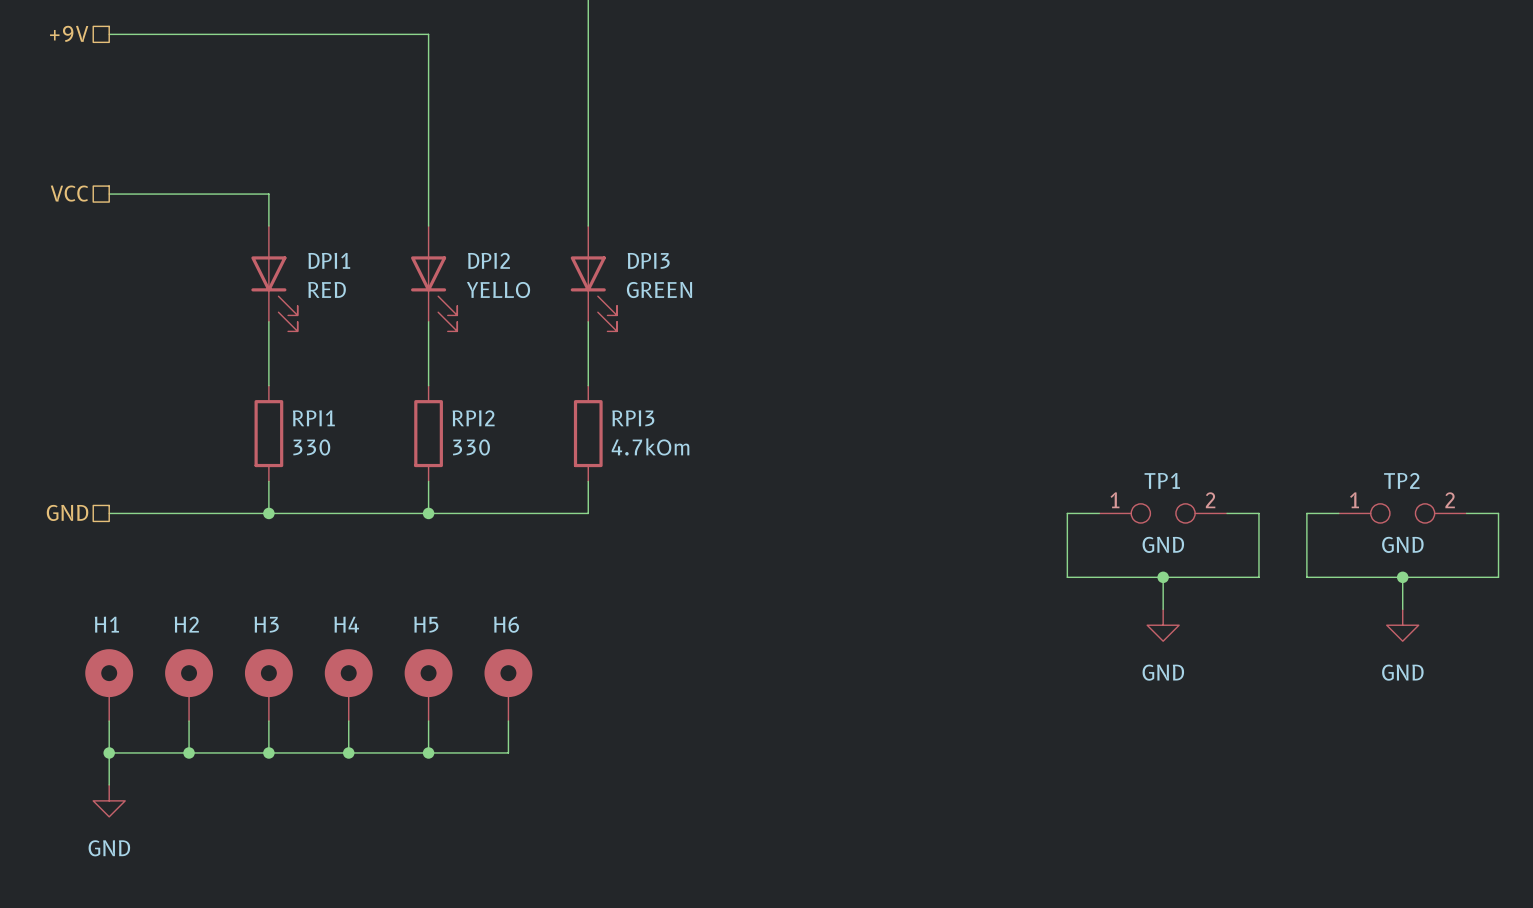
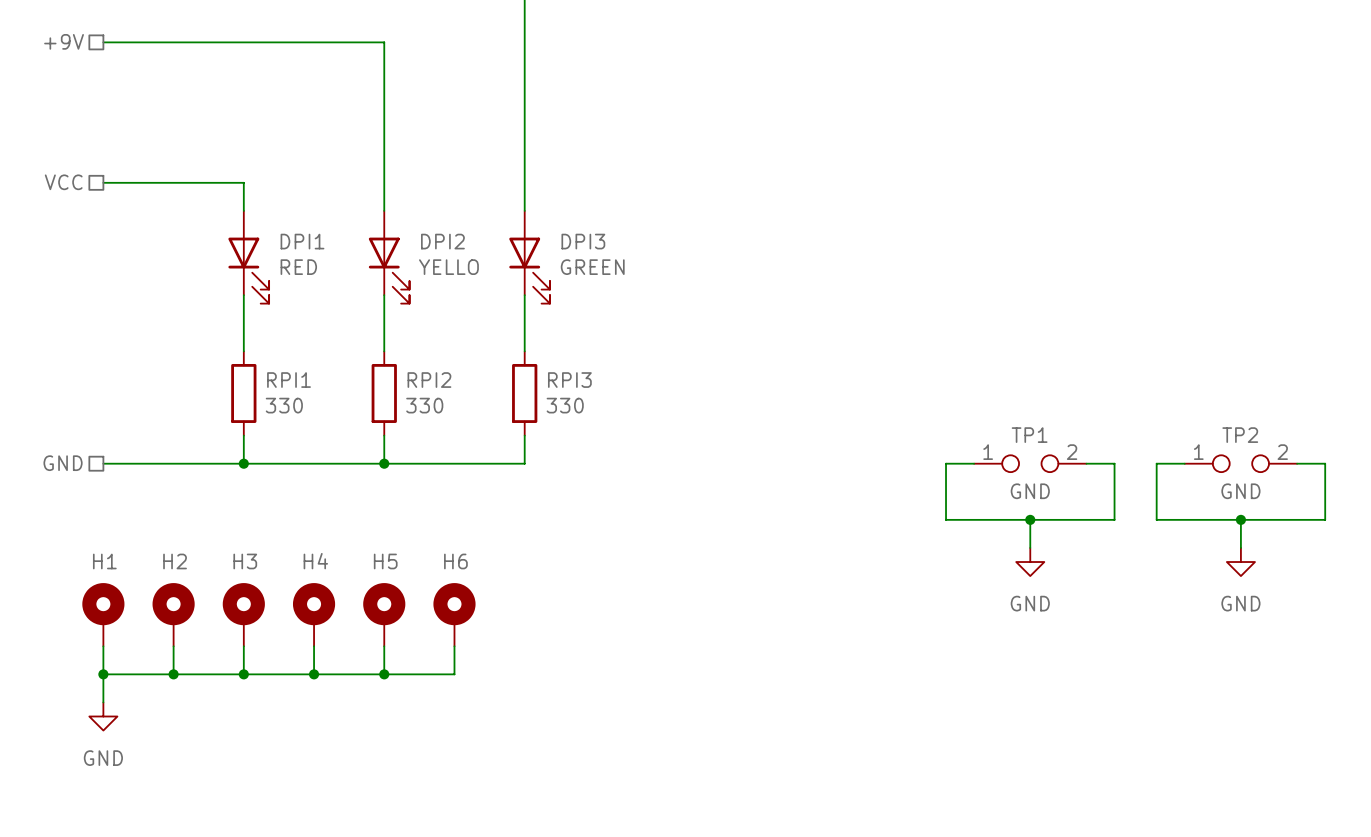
RPI3 value: 4.7kOm (650, 446) -> 330 (565, 405)

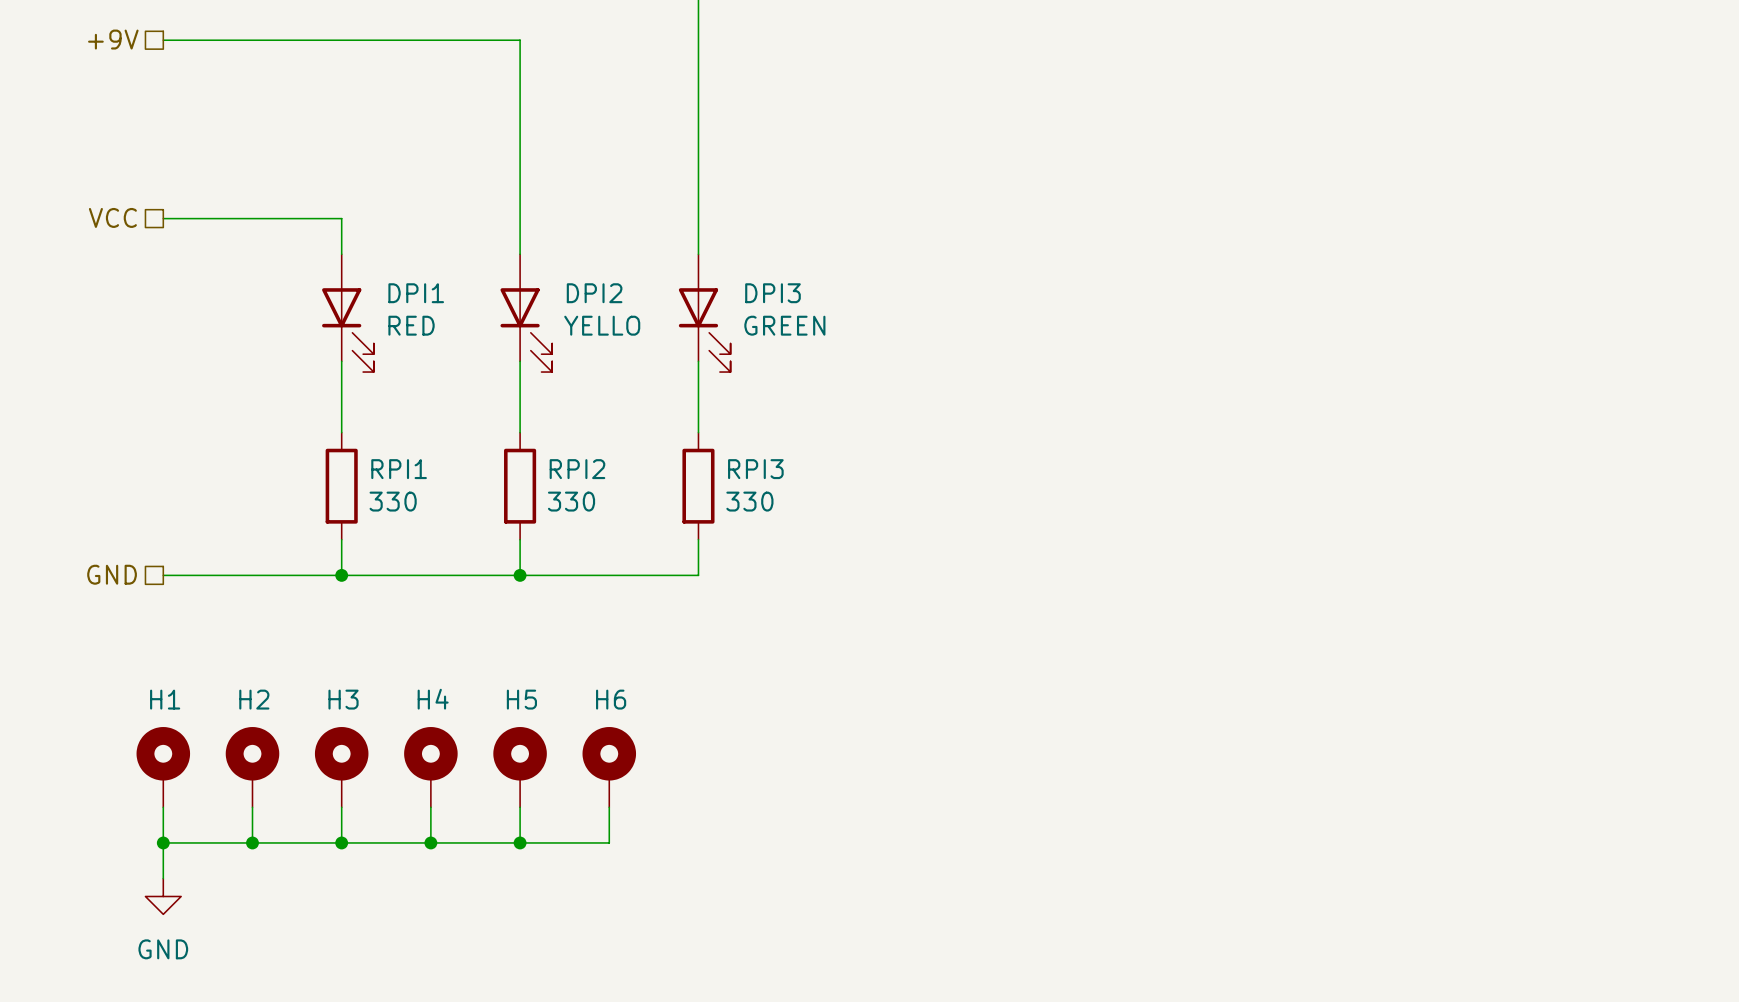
wire: (974, 463) (946, 463) (946, 519) (1114, 519) (1114, 463) (1086, 463) -> none
TP1: GND (1030, 463) -> none
wire: (1184, 463) (1156, 463) (1156, 519) (1325, 519) (1325, 463) (1297, 463) -> none
TP2: GND (1240, 463) -> none
wire: (1030, 519) (1030, 547) -> none
junction: (1030, 519) -> none
wire: (1240, 519) (1240, 547) -> none
junction: (1240, 519) -> none
power symbol: GND (1030, 562) -> none
power symbol: GND (1240, 562) -> none

